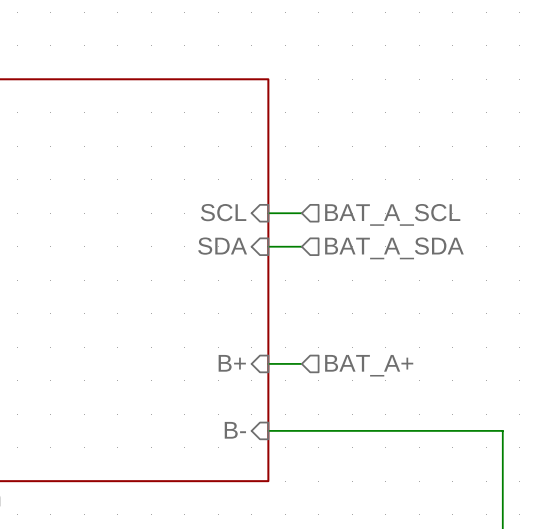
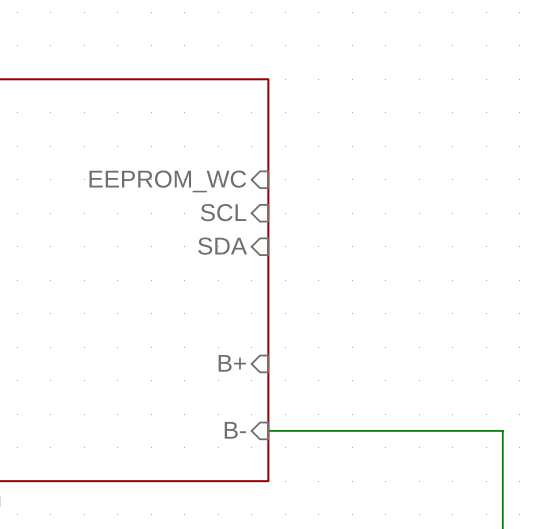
sheet pin: none -> EEPROM_WC (167, 181)
wire: (268, 213) (301, 213) -> none
hierarchical label: BAT_A_SCL (392, 214) -> none
wire: (268, 246) (301, 246) -> none
hierarchical label: BAT_A_SDA (394, 248) -> none
wire: (268, 363) (301, 363) -> none
hierarchical label: BAT_A+ (369, 365) -> none

